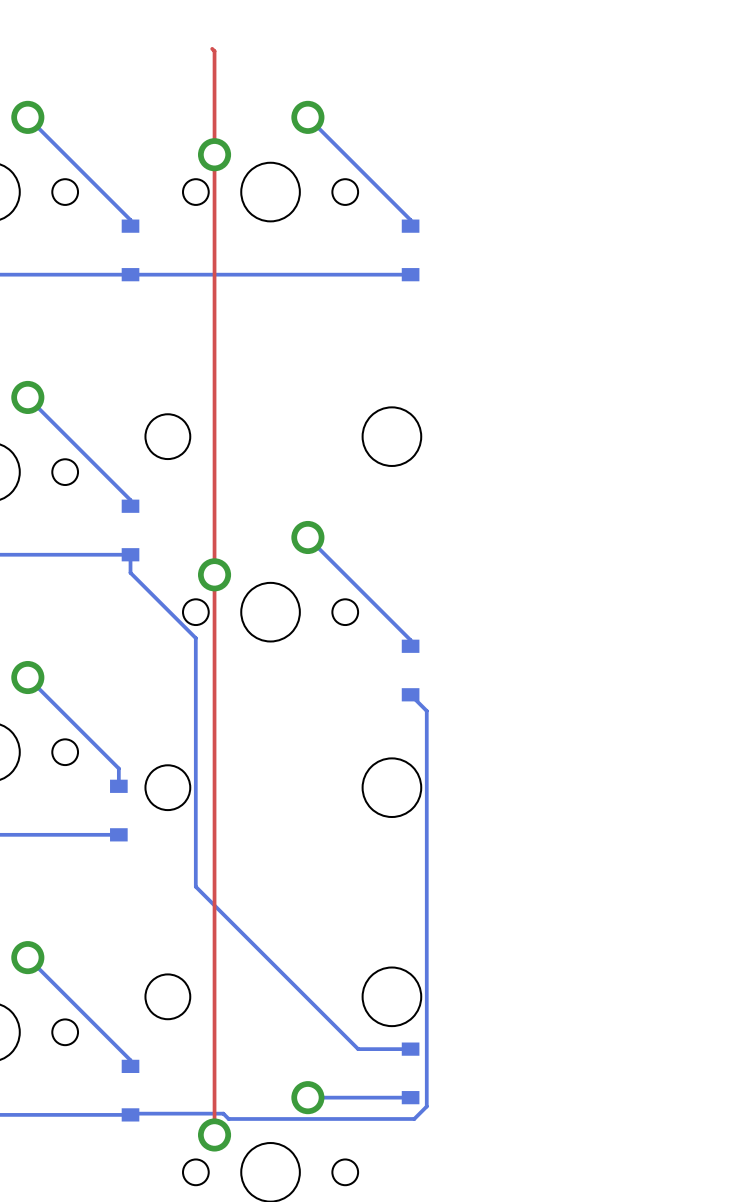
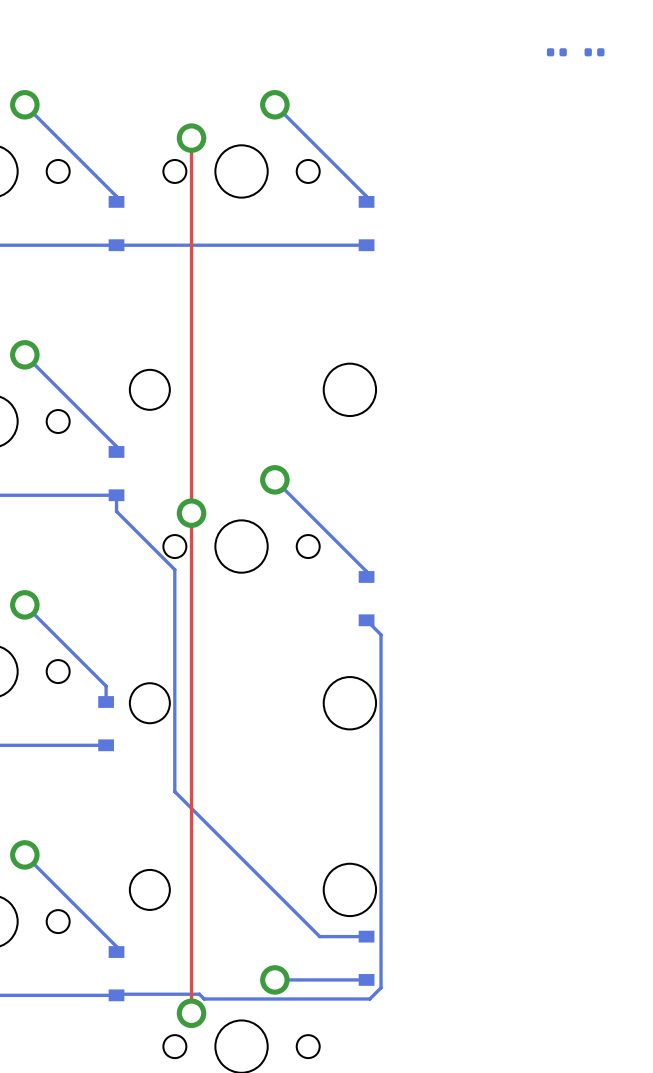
top track: (212, 48) (214, 51) (214, 154) -> none
part: none -> (556, 52)
part: none -> (594, 52)

